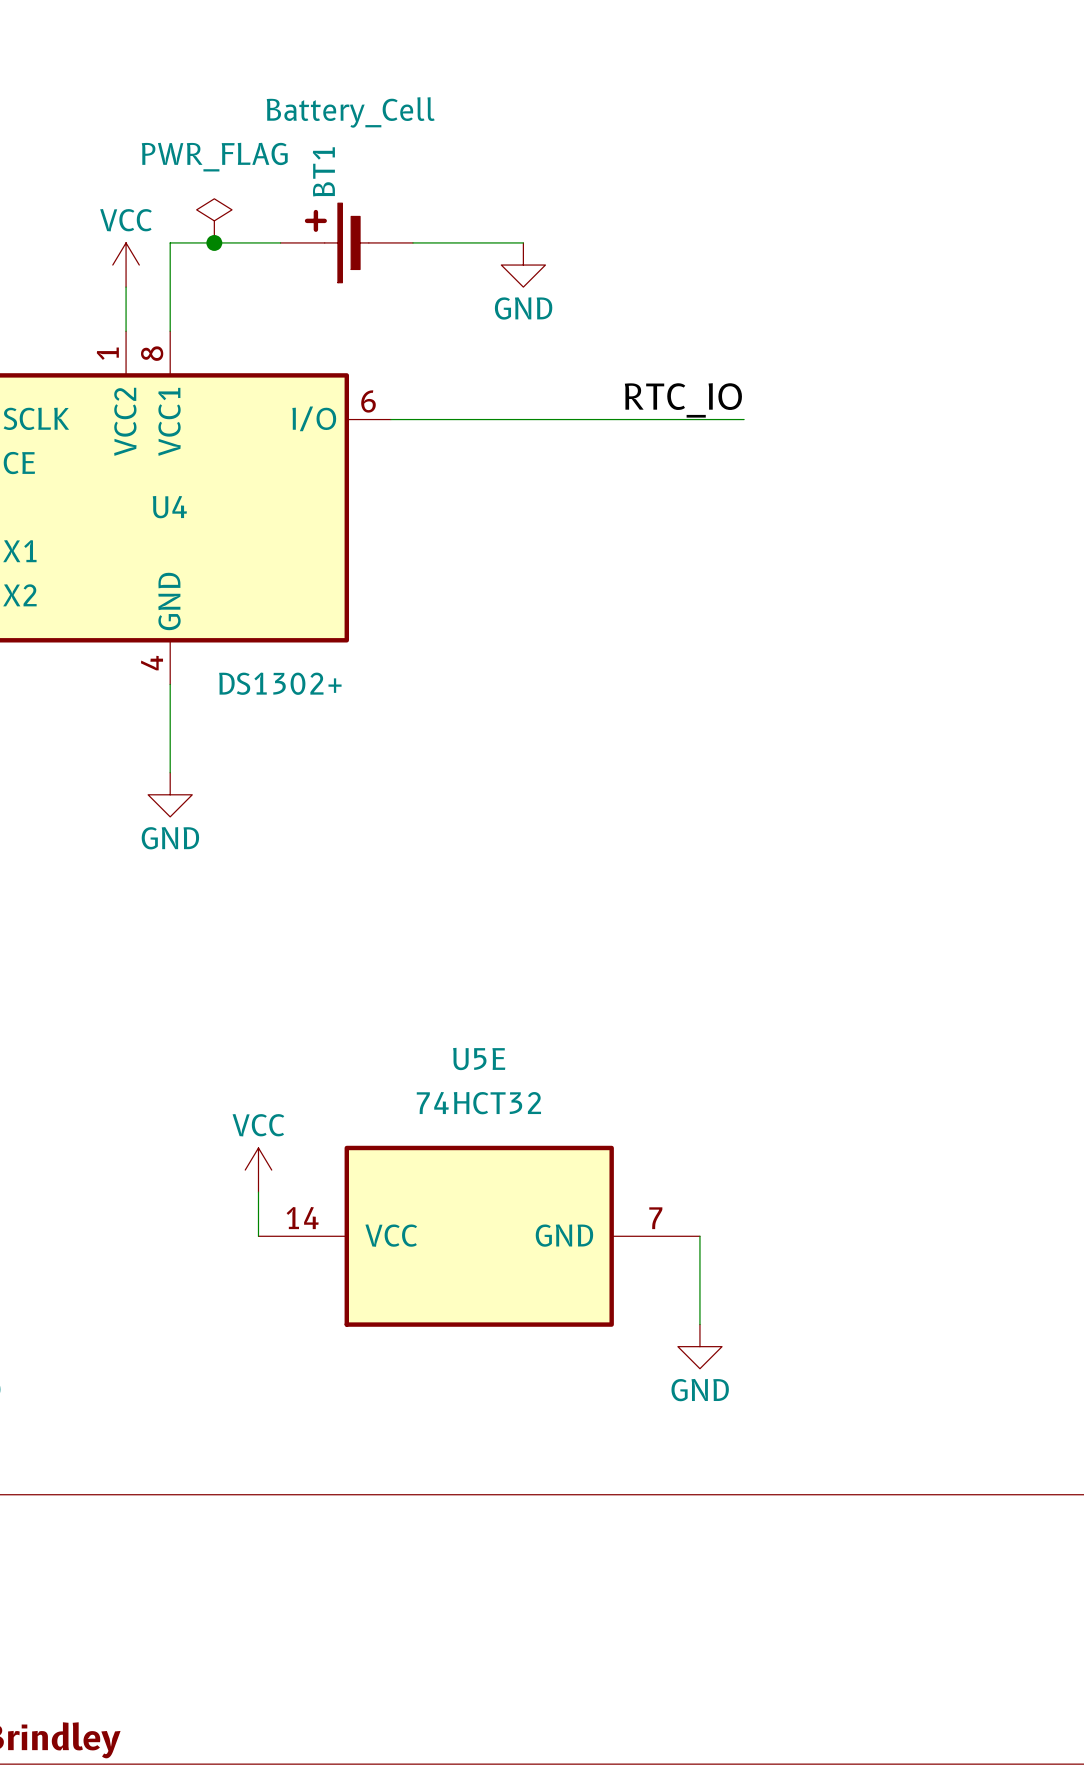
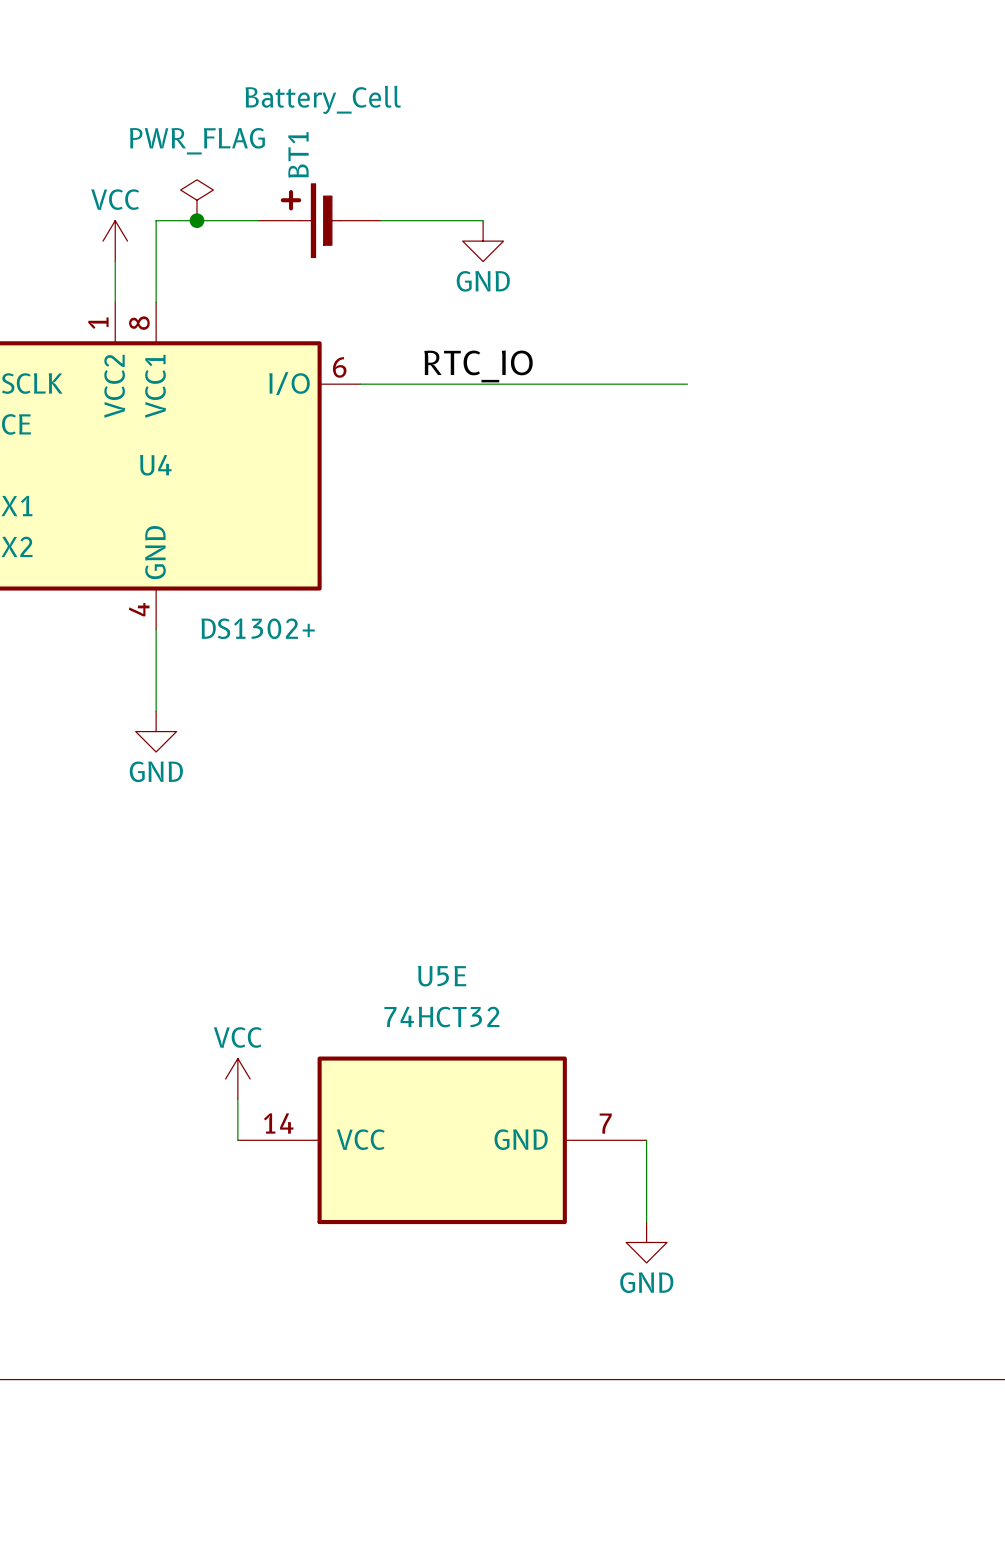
label position: RTC_IO (683, 400) -> RTC_IO (478, 366)

